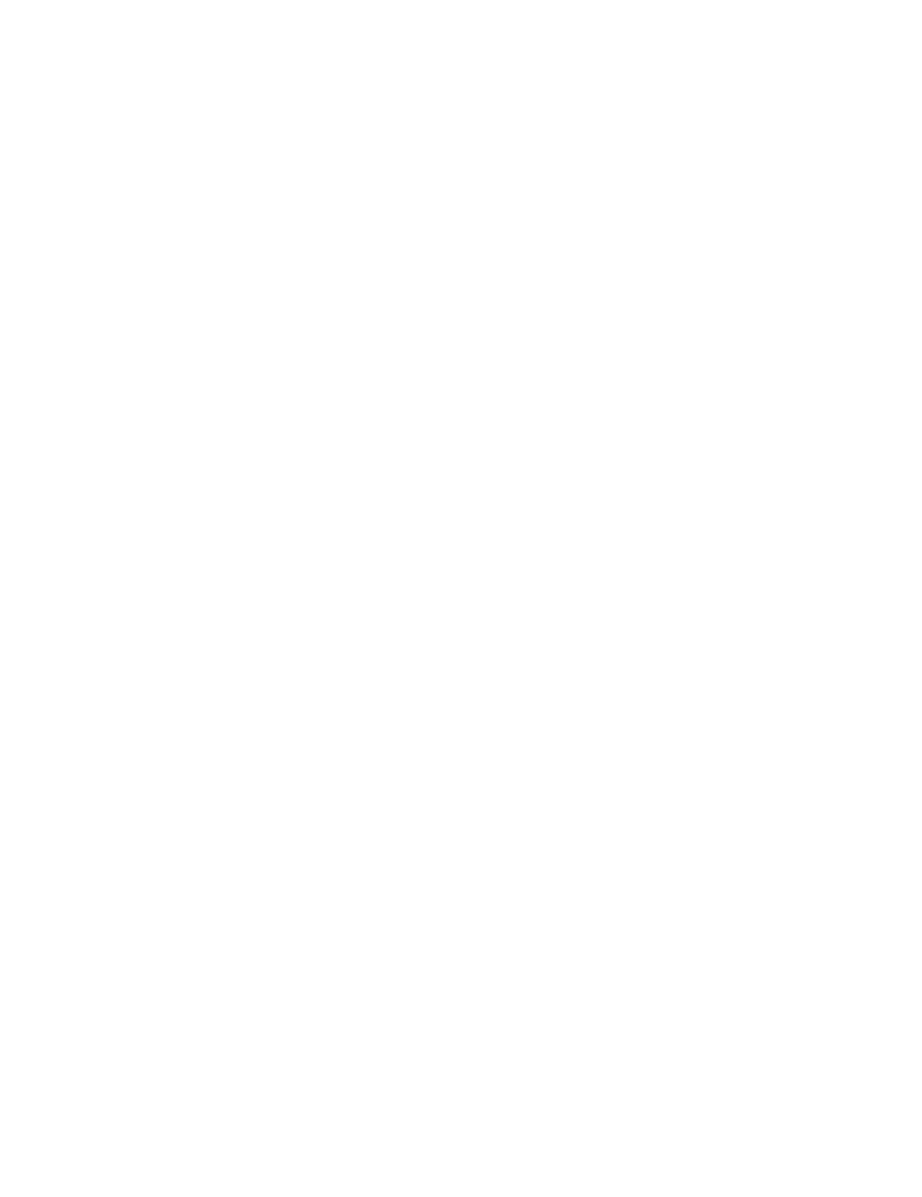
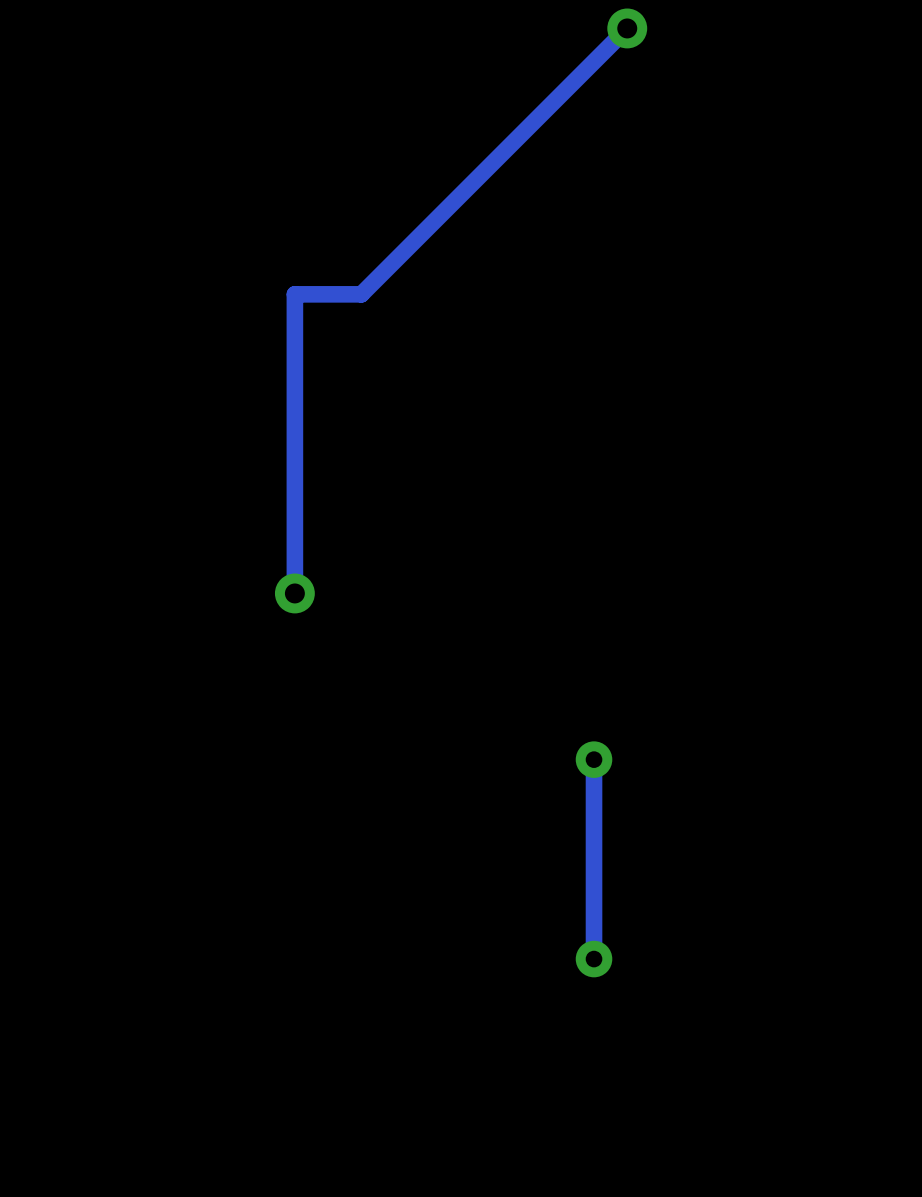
track: none -> (627, 28) (361, 294) (294, 294) (294, 593)
via: none -> (627, 28)
via: none -> (294, 593)
track: none -> (594, 759) (594, 959)
via: none -> (594, 759)
via: none -> (594, 959)

